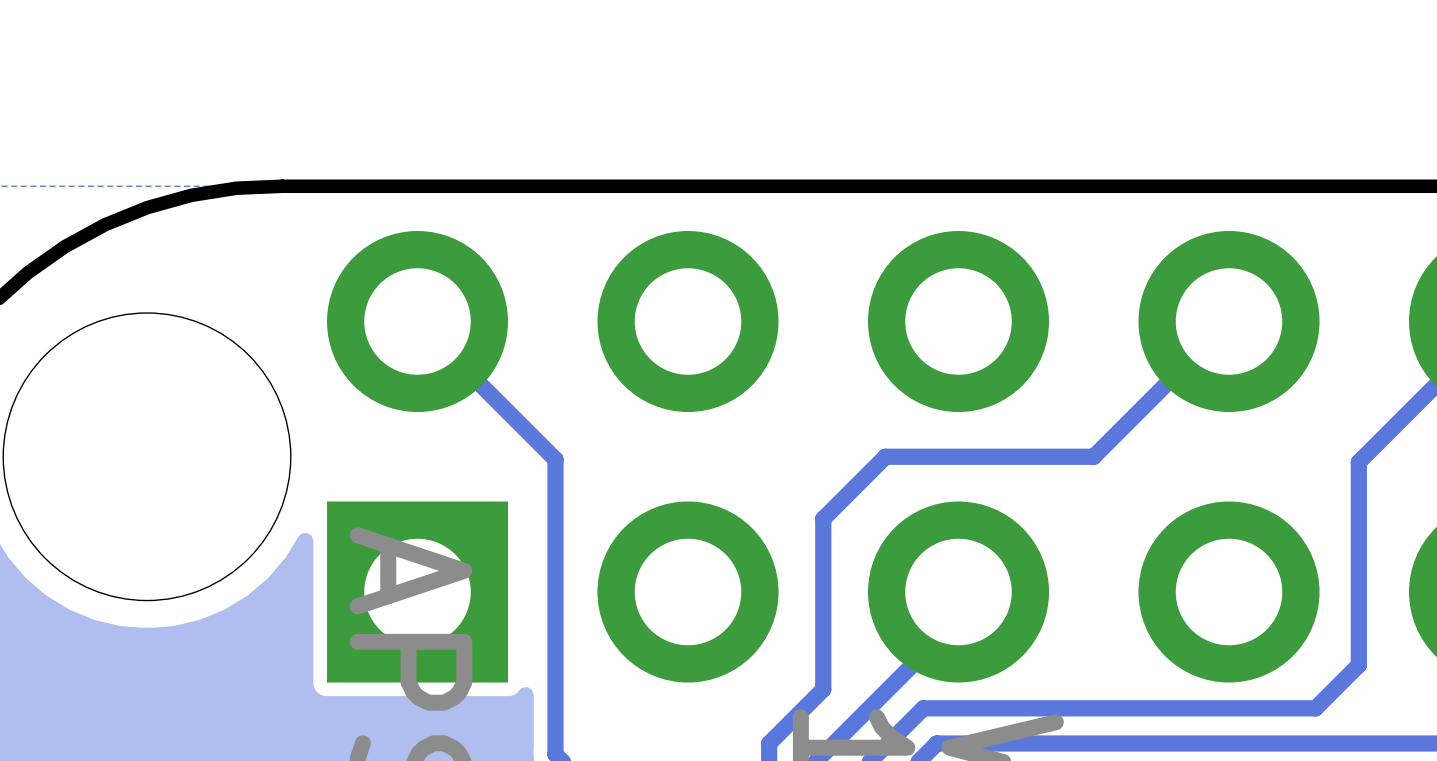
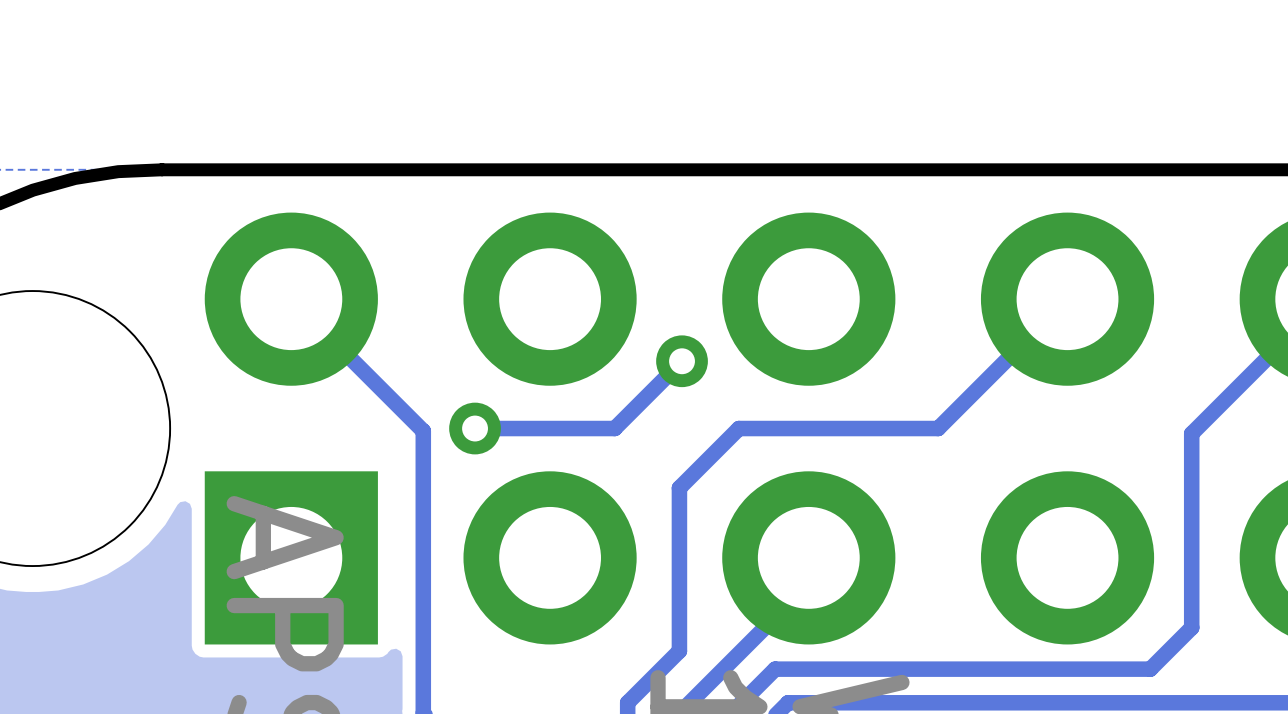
track: none -> (682, 361) (614, 428) (475, 428)
via: none -> (682, 361)
via: none -> (475, 428)

